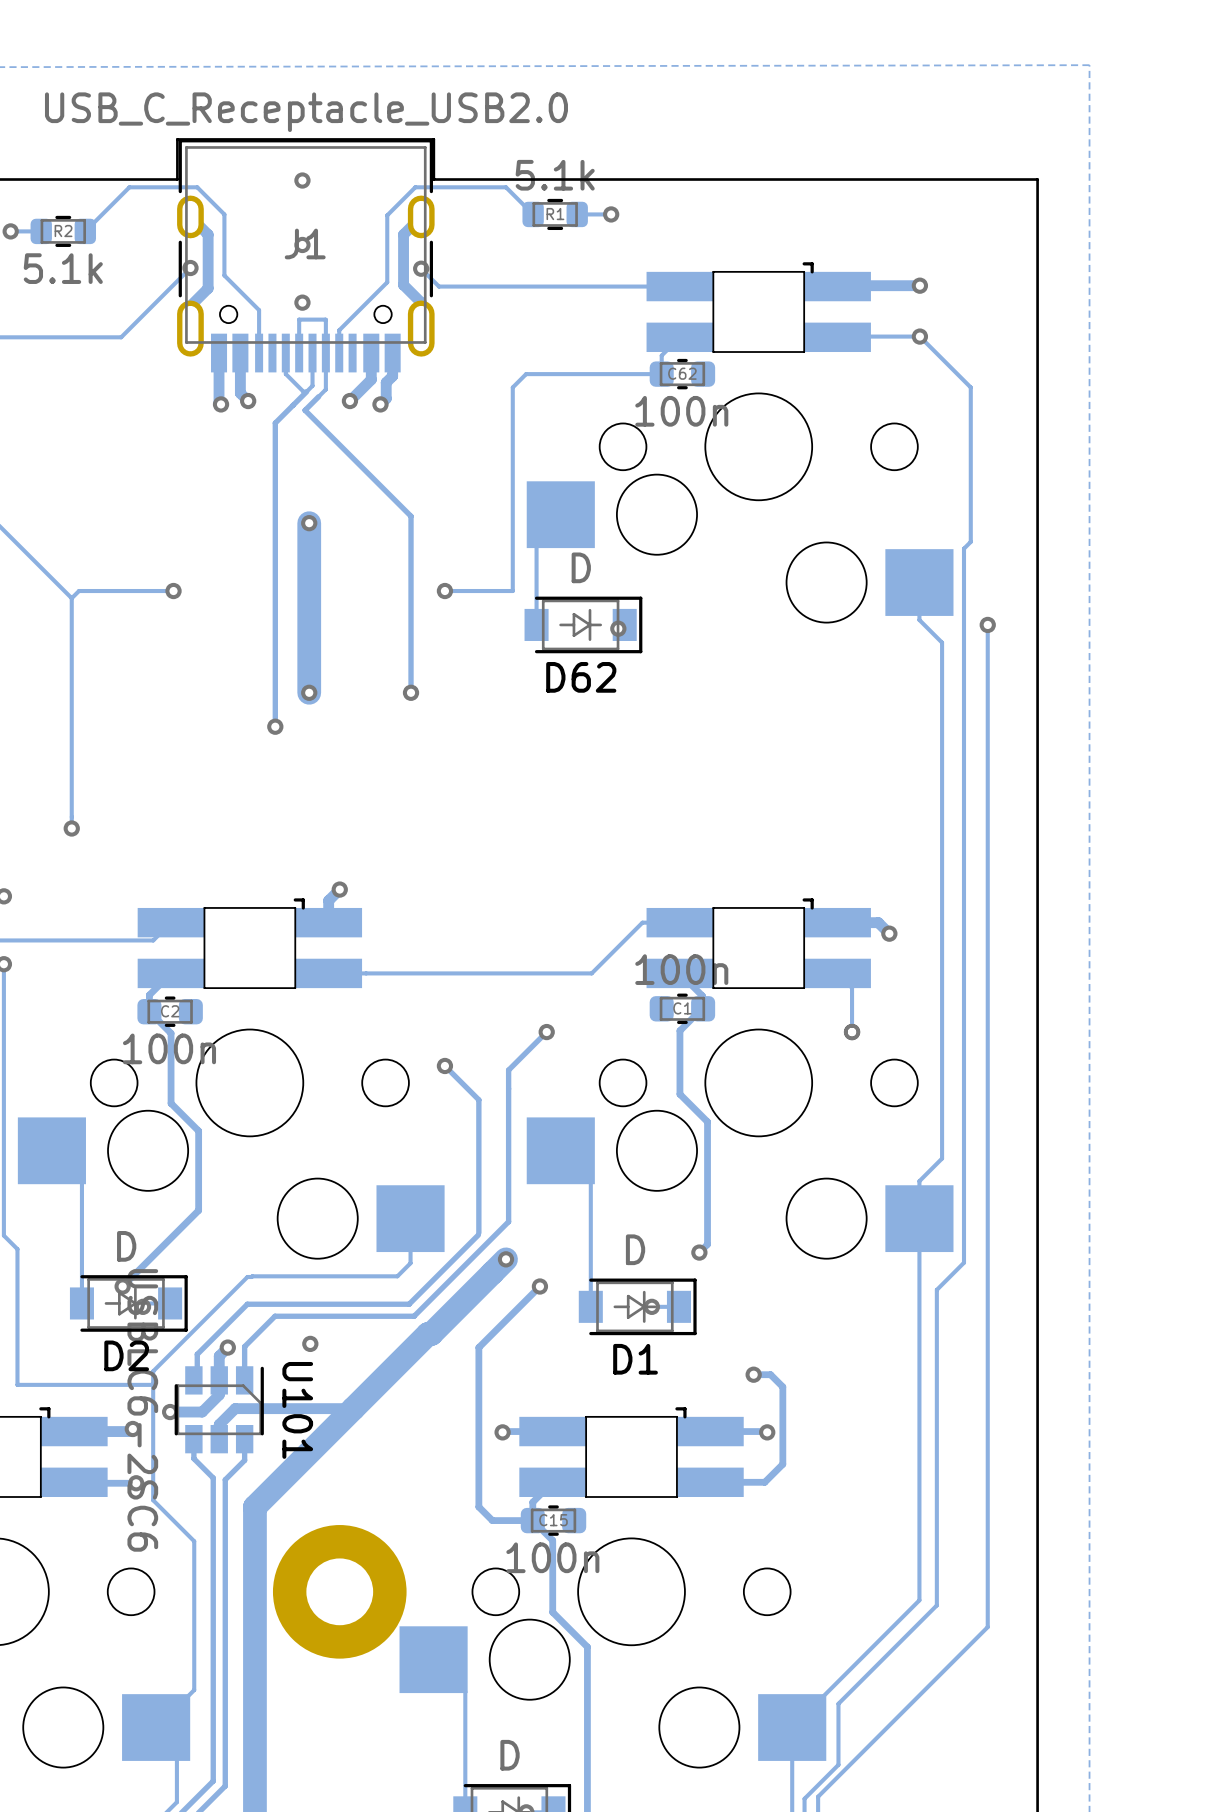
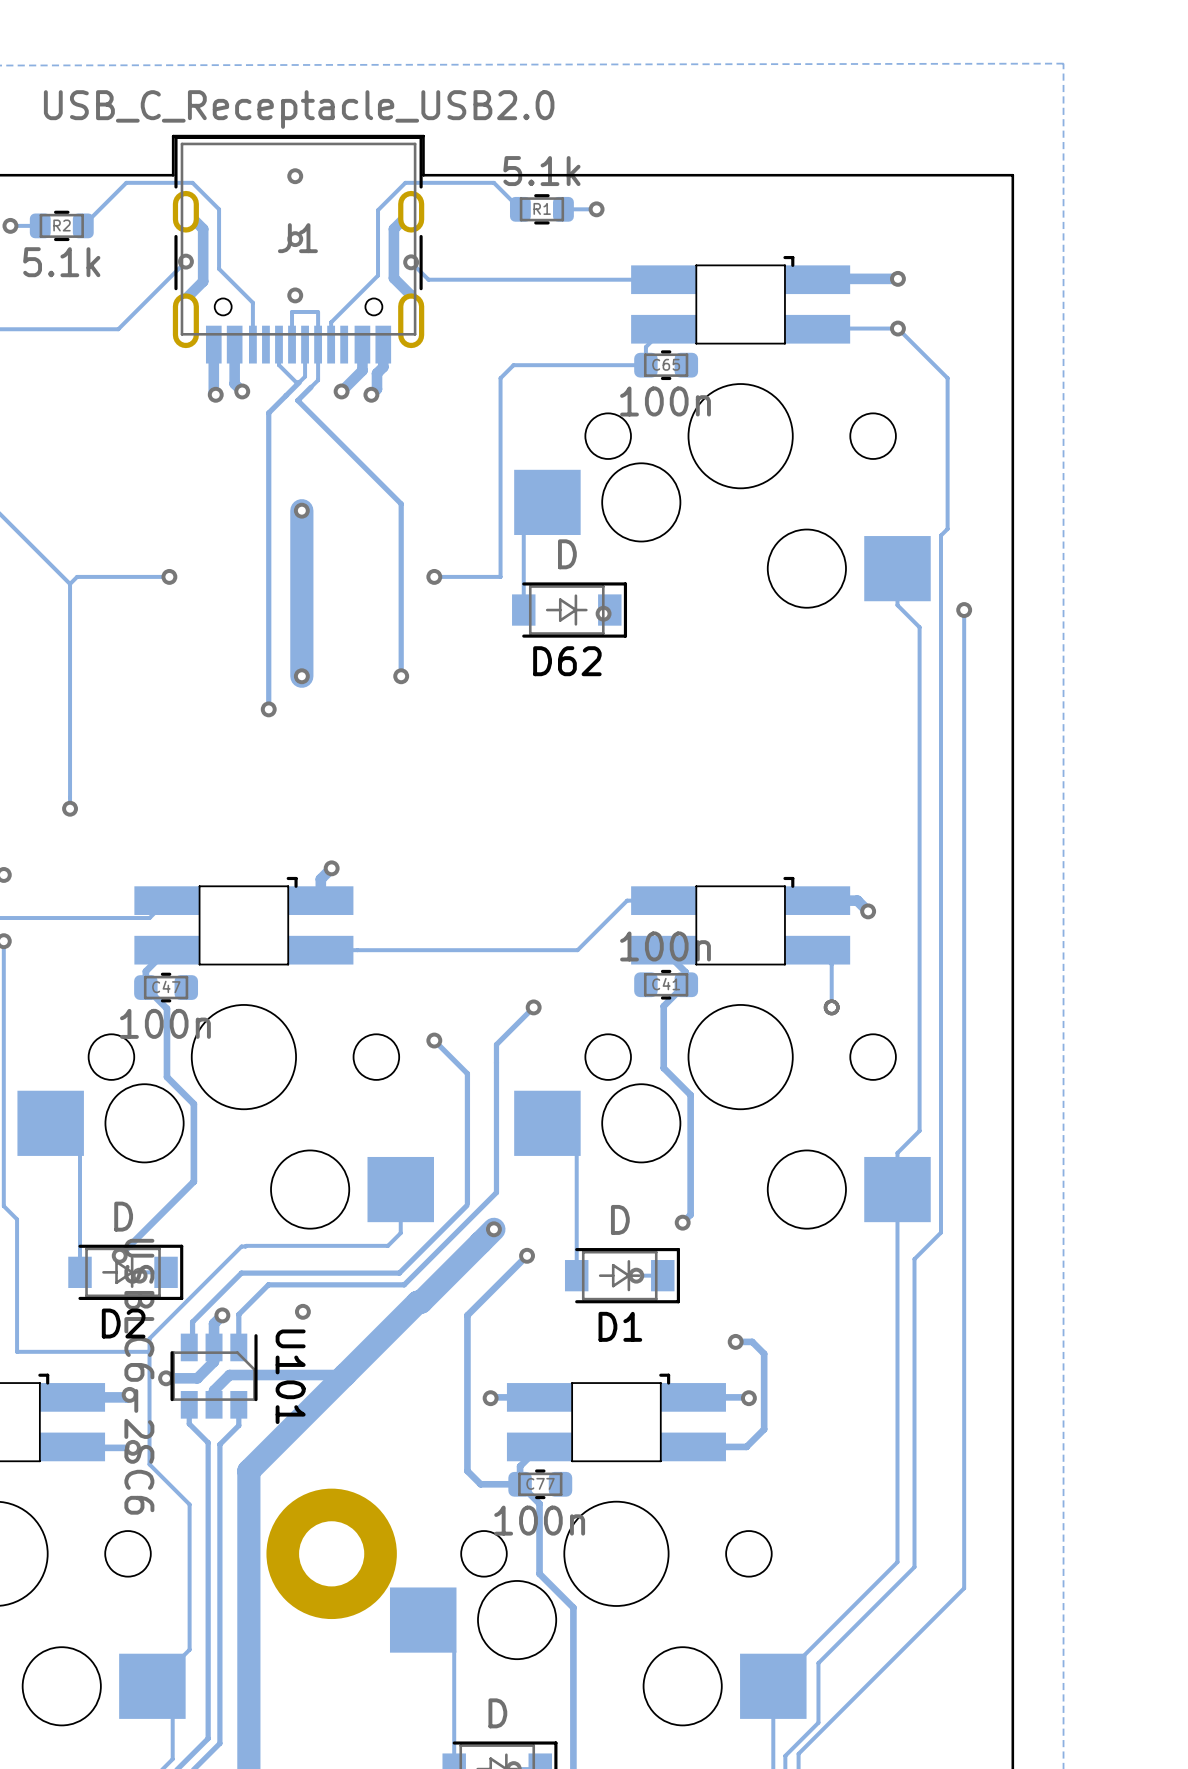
C62 name: C62 (682, 373) -> C65 (666, 364)
C1 name: C1 (682, 1008) -> C41 (666, 984)
C2 name: C2 (170, 1011) -> C47 (166, 986)
C15 name: C15 (553, 1520) -> C77 (540, 1483)

